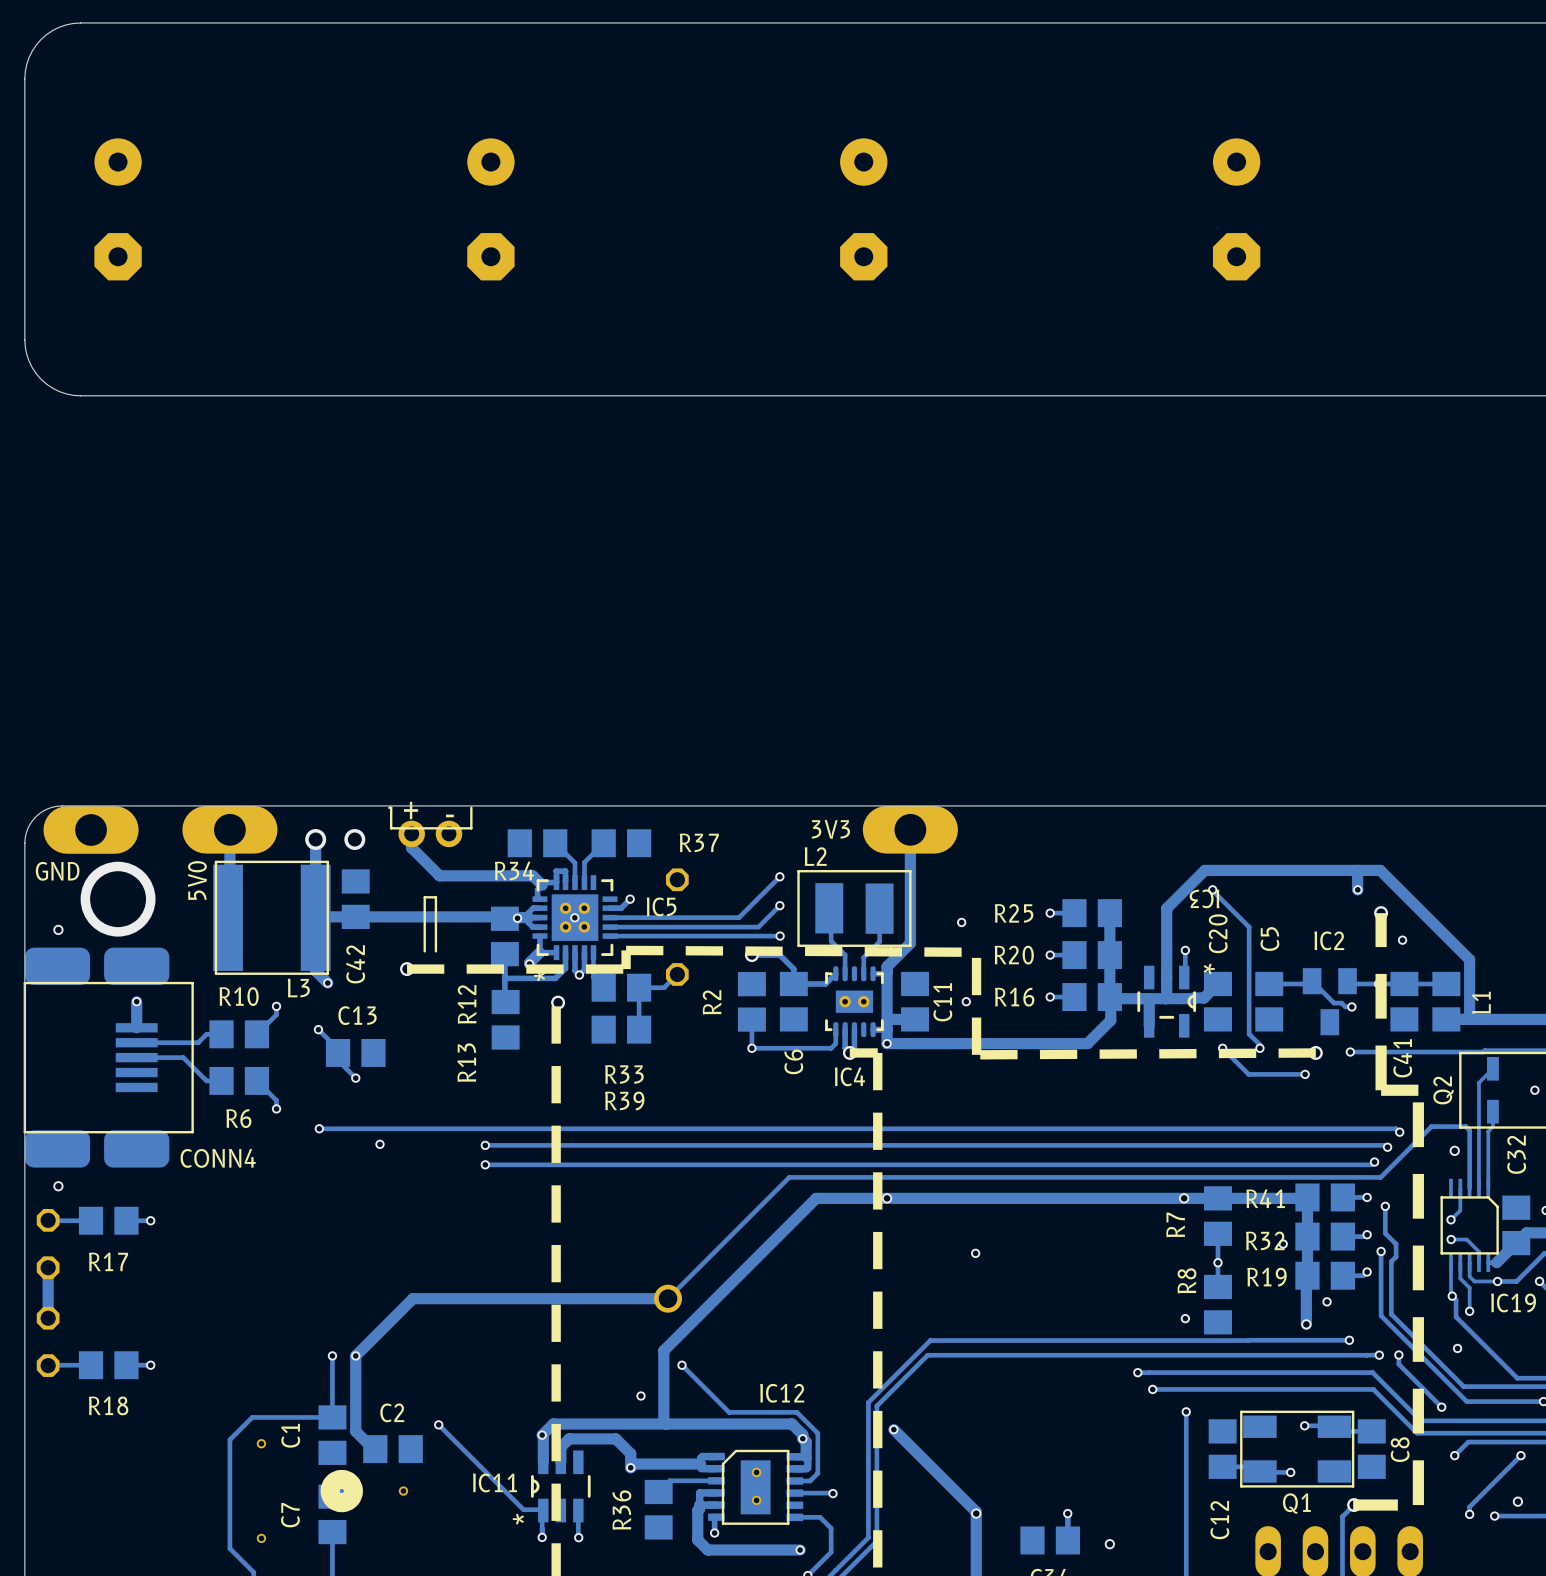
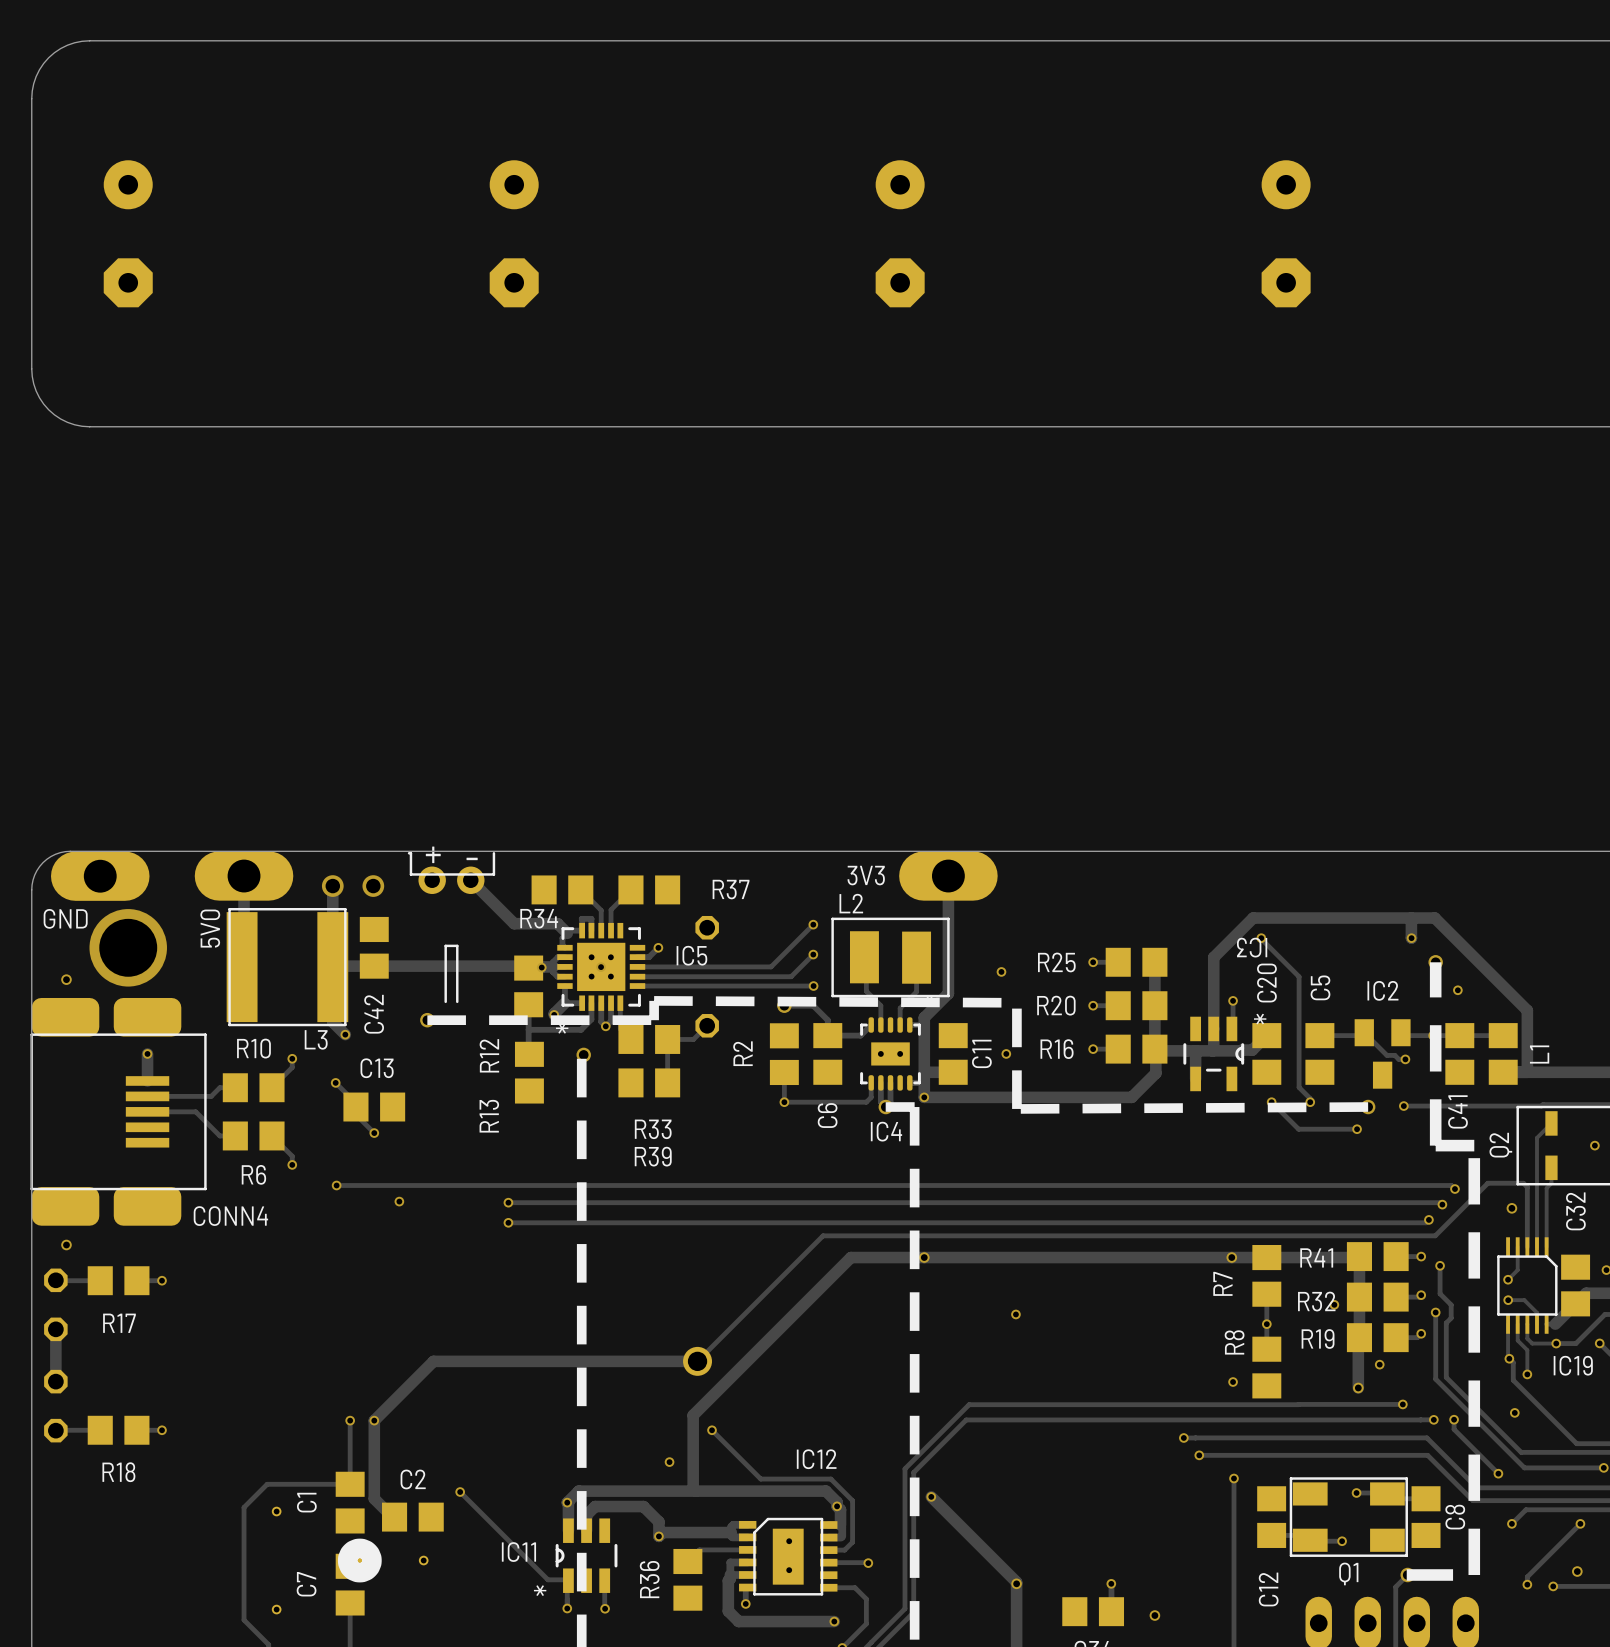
track: (411, 833) (411, 847) (439, 875) (490, 875) -> (470, 880) (514, 923)

